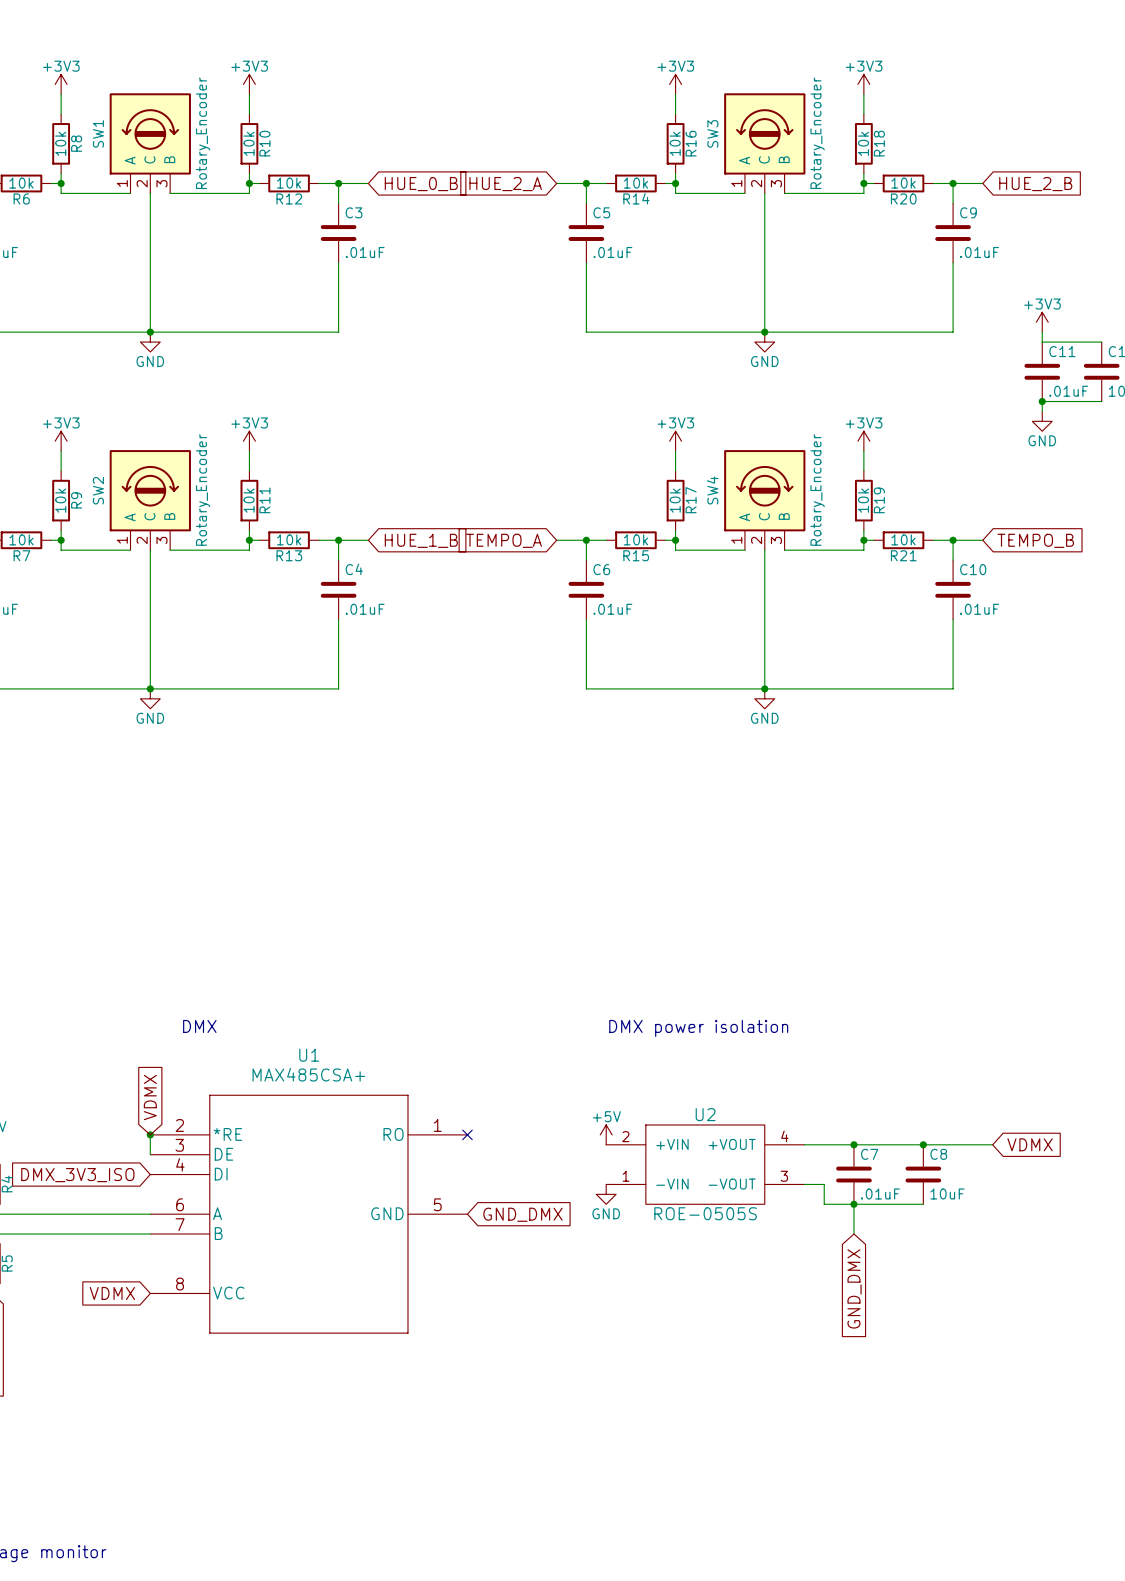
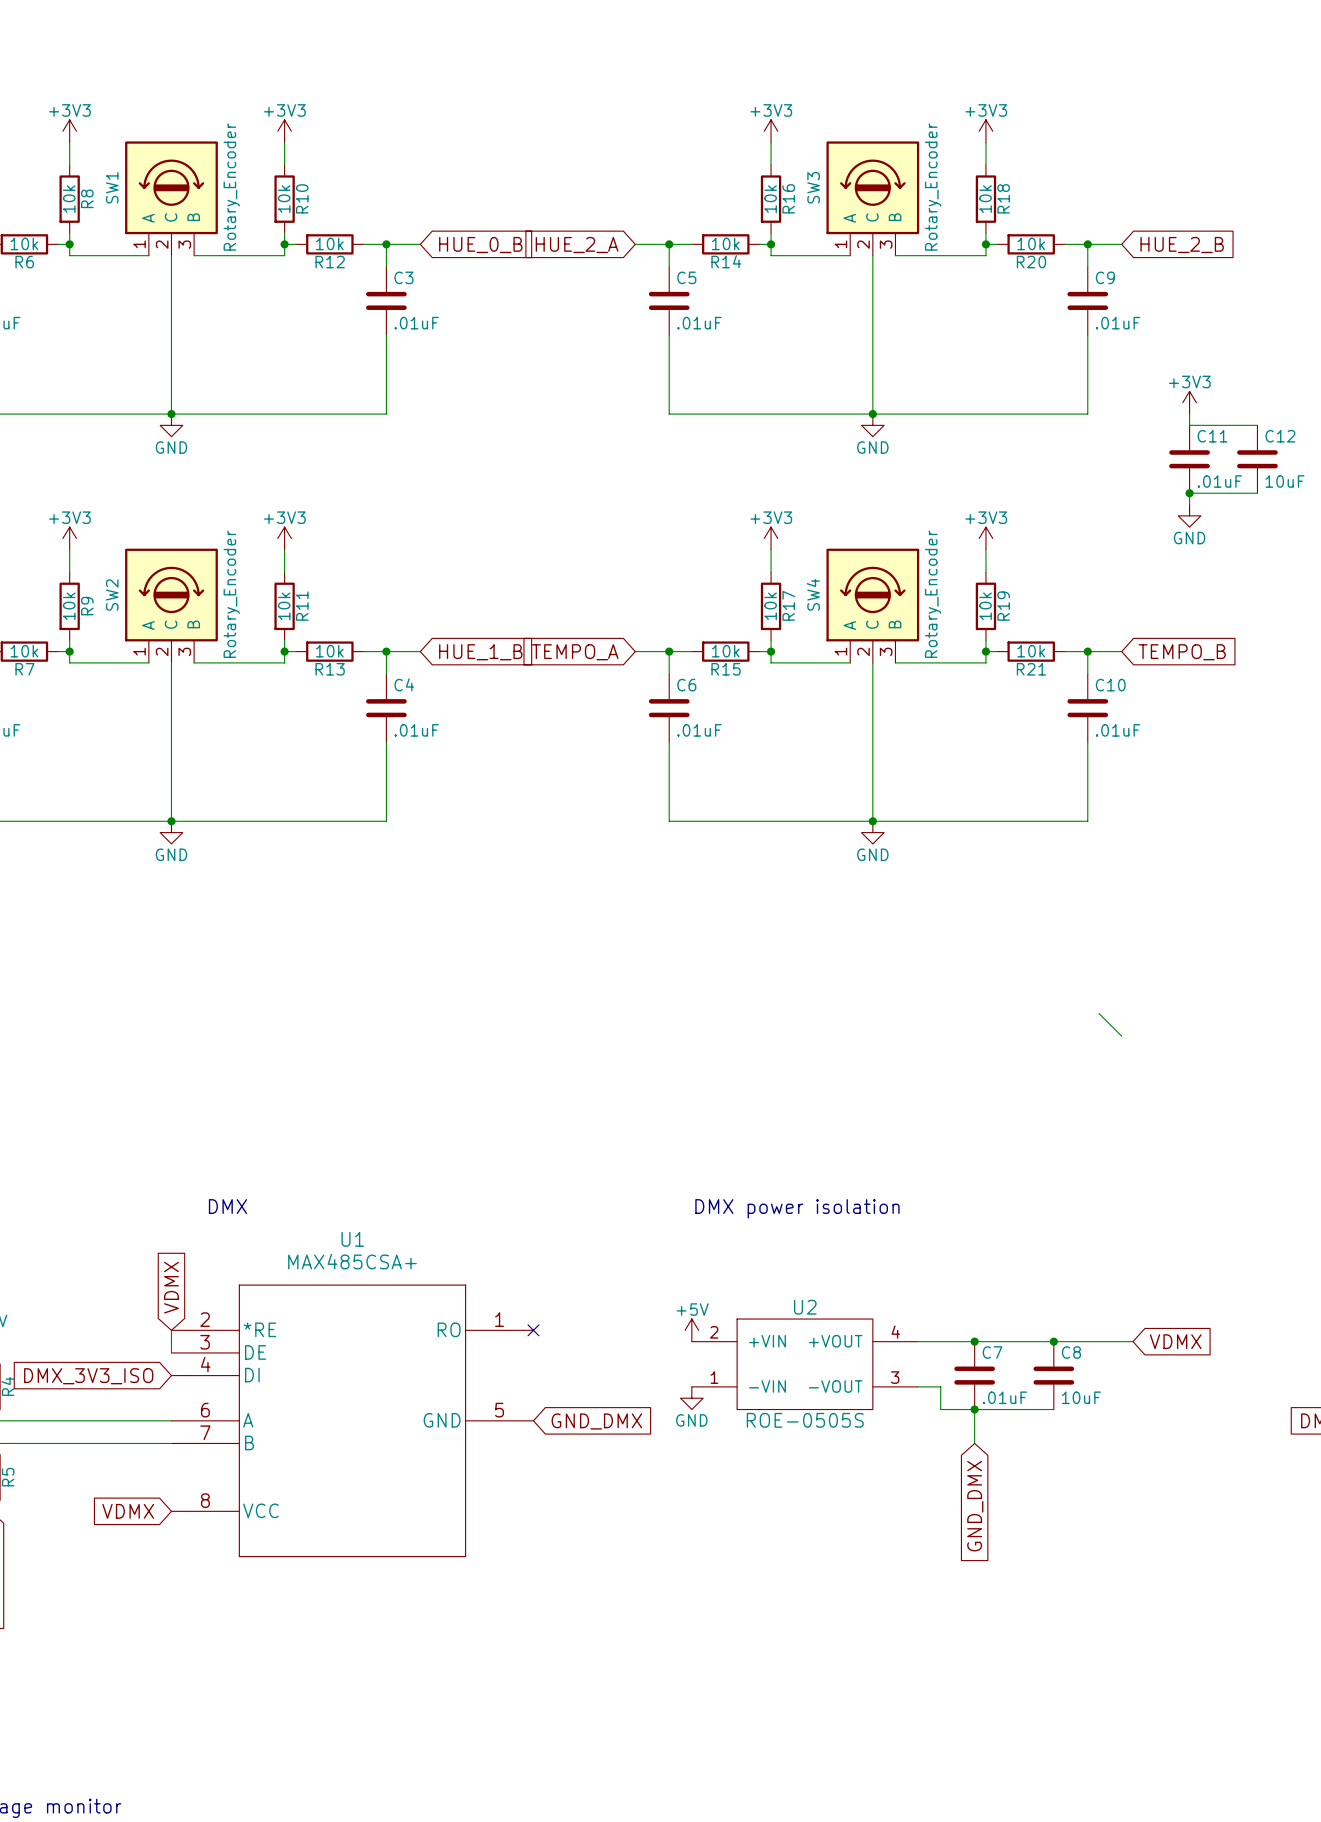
wire: none -> (1099, 1013) (1121, 1036)
junction: (150, 1134) -> none

